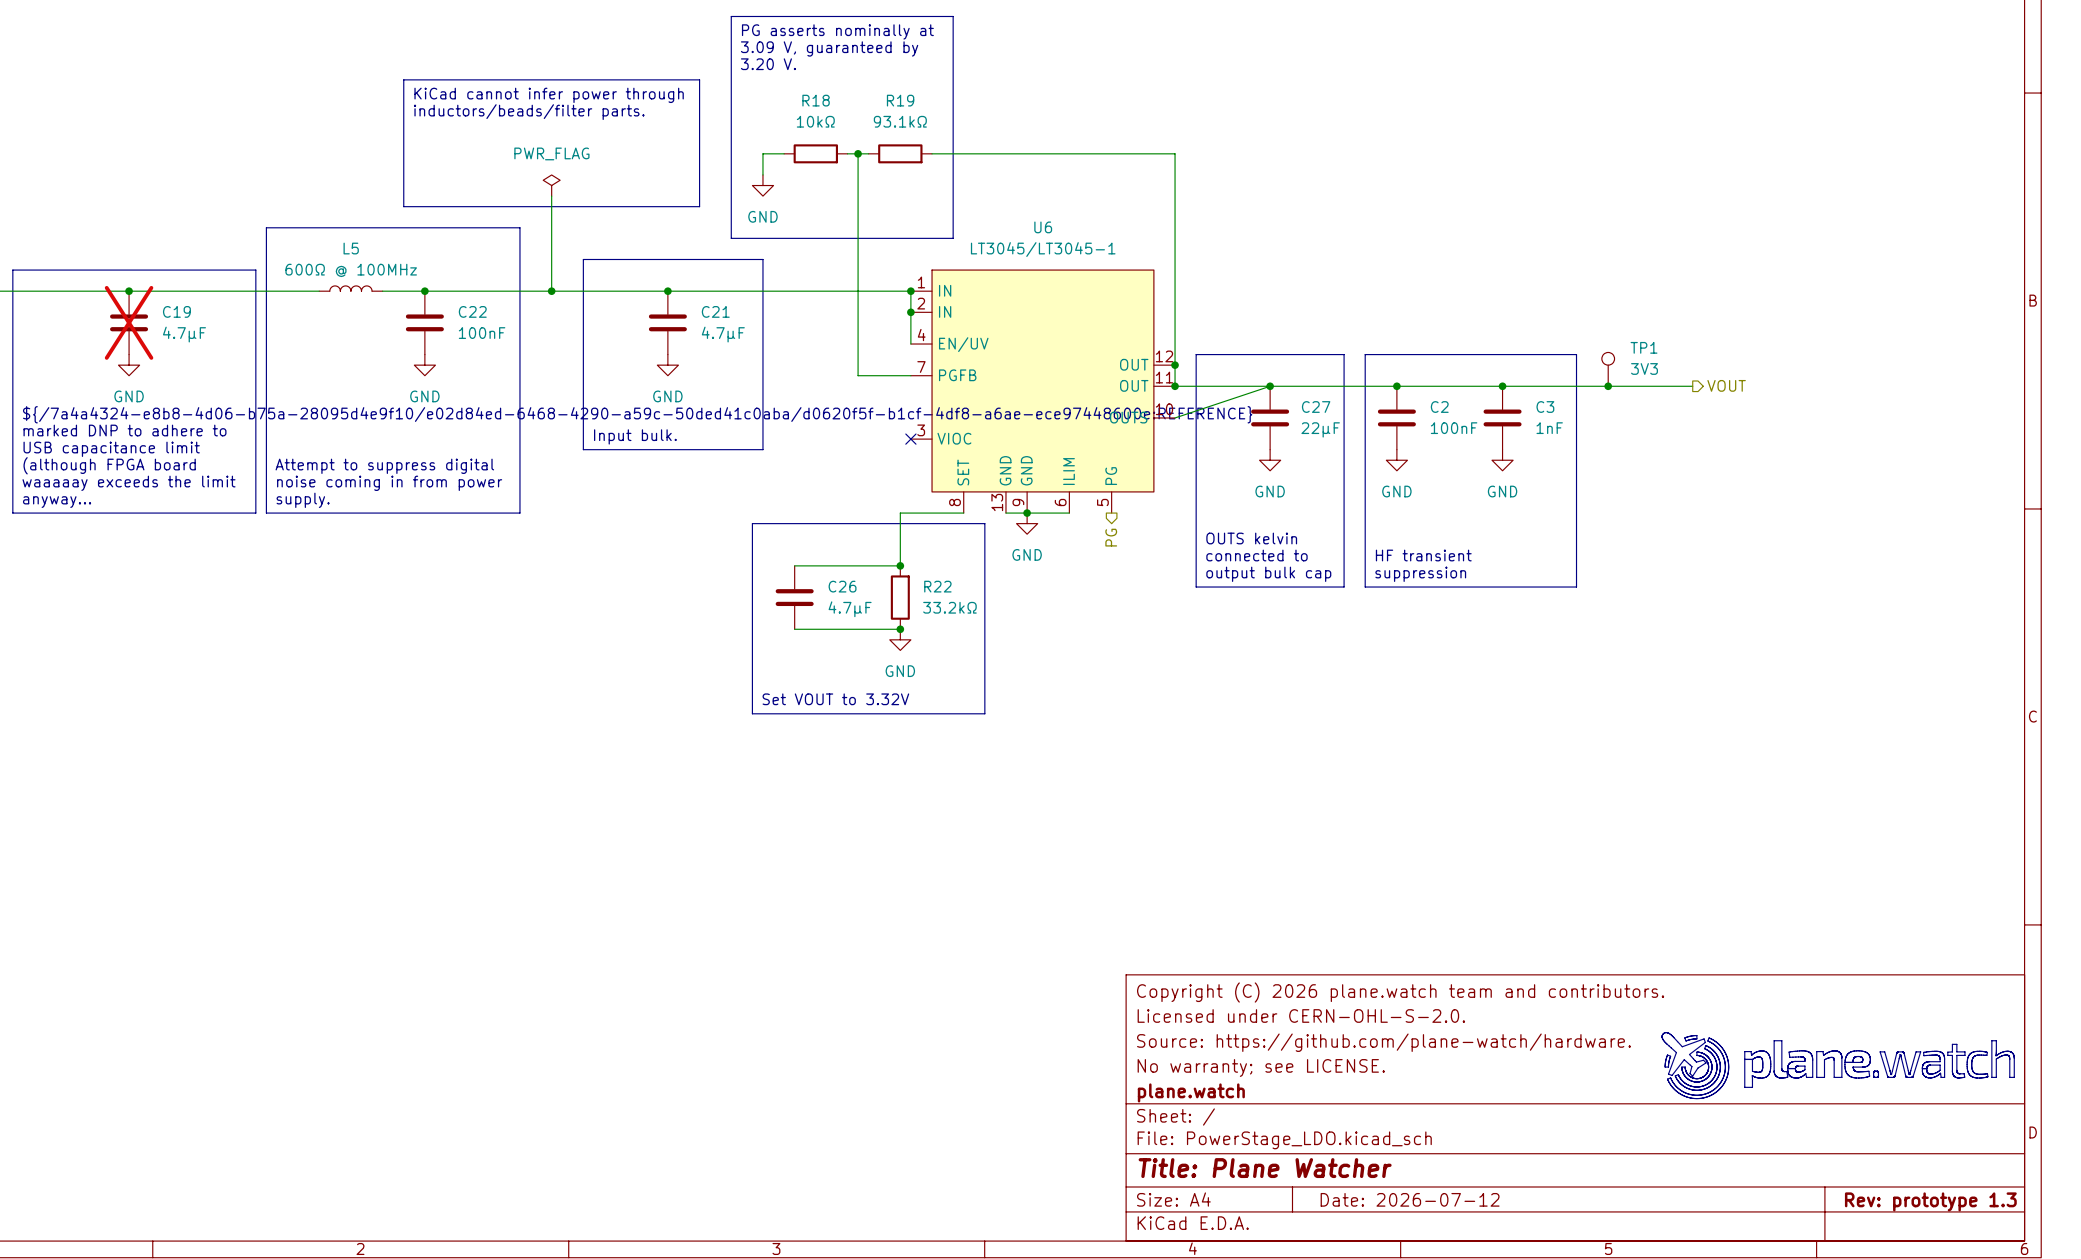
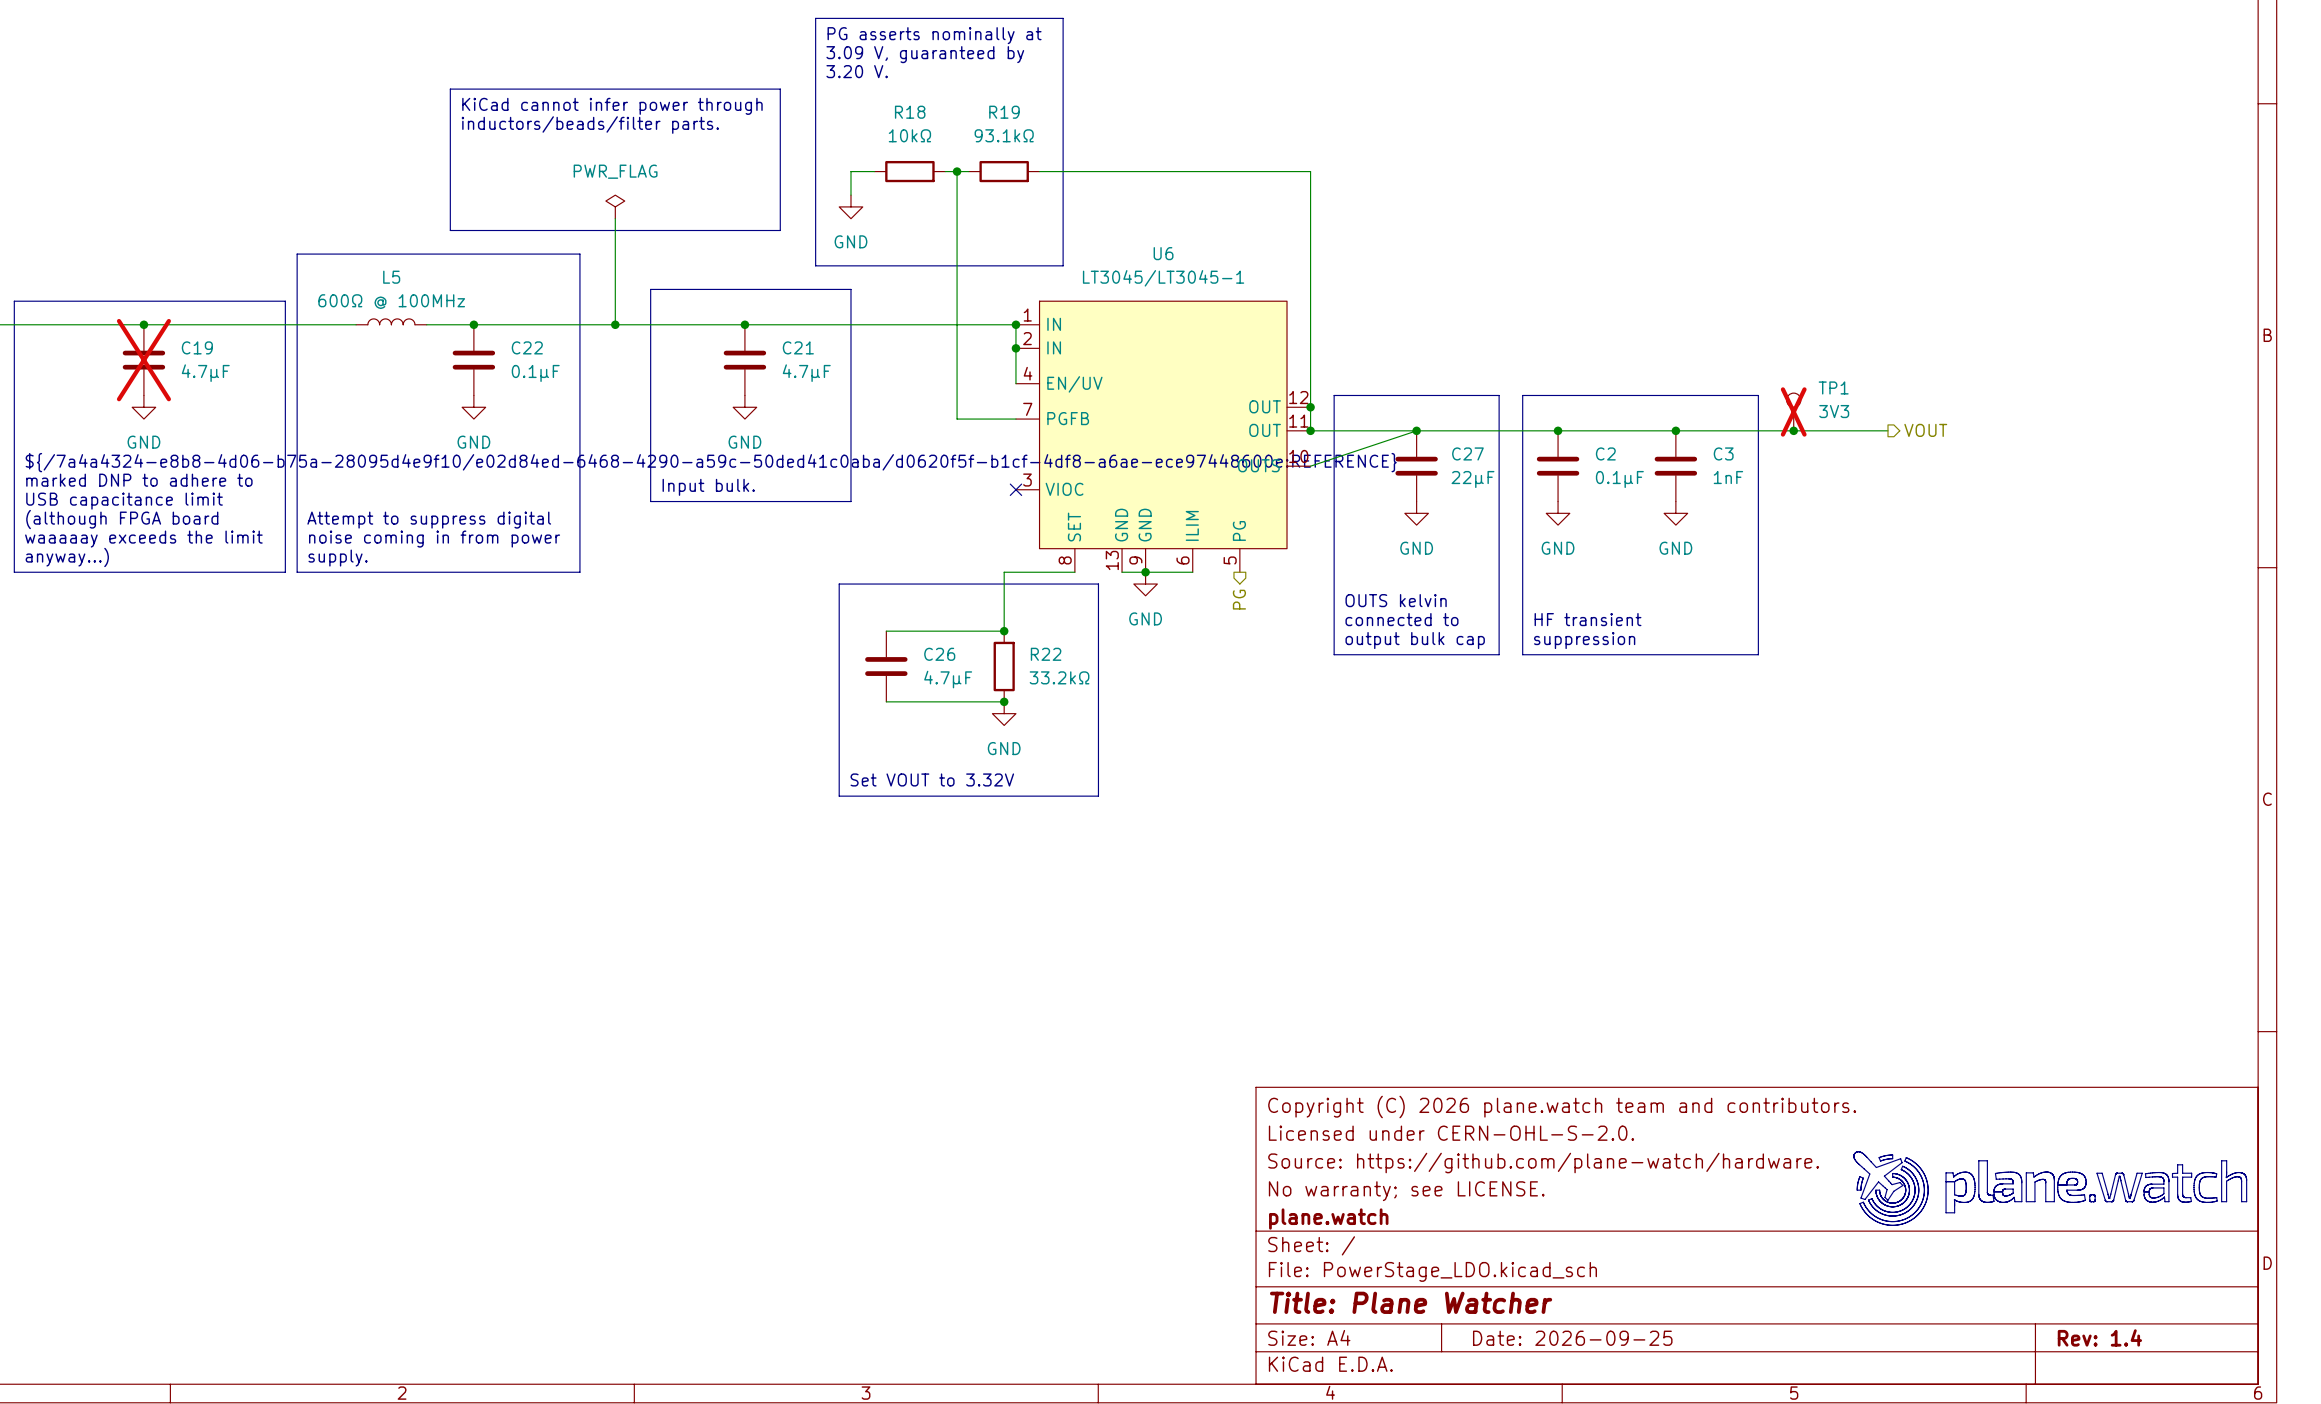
C22 value: 100nF (482, 333) -> 0.1µF (535, 373)
TP1 do-not-place cross: none -> (1793, 411)
C2 value: 100nF (1454, 428) -> 0.1µF (1619, 479)
text: anyway... (57, 502) -> anyway...) (67, 557)
title block: Date: 2026-07-12 (1410, 1199) -> Date: 2026-09-25 (1572, 1338)
title block: Rev: prototype 1.3 (1930, 1201) -> Rev: 1.4 (2099, 1337)

